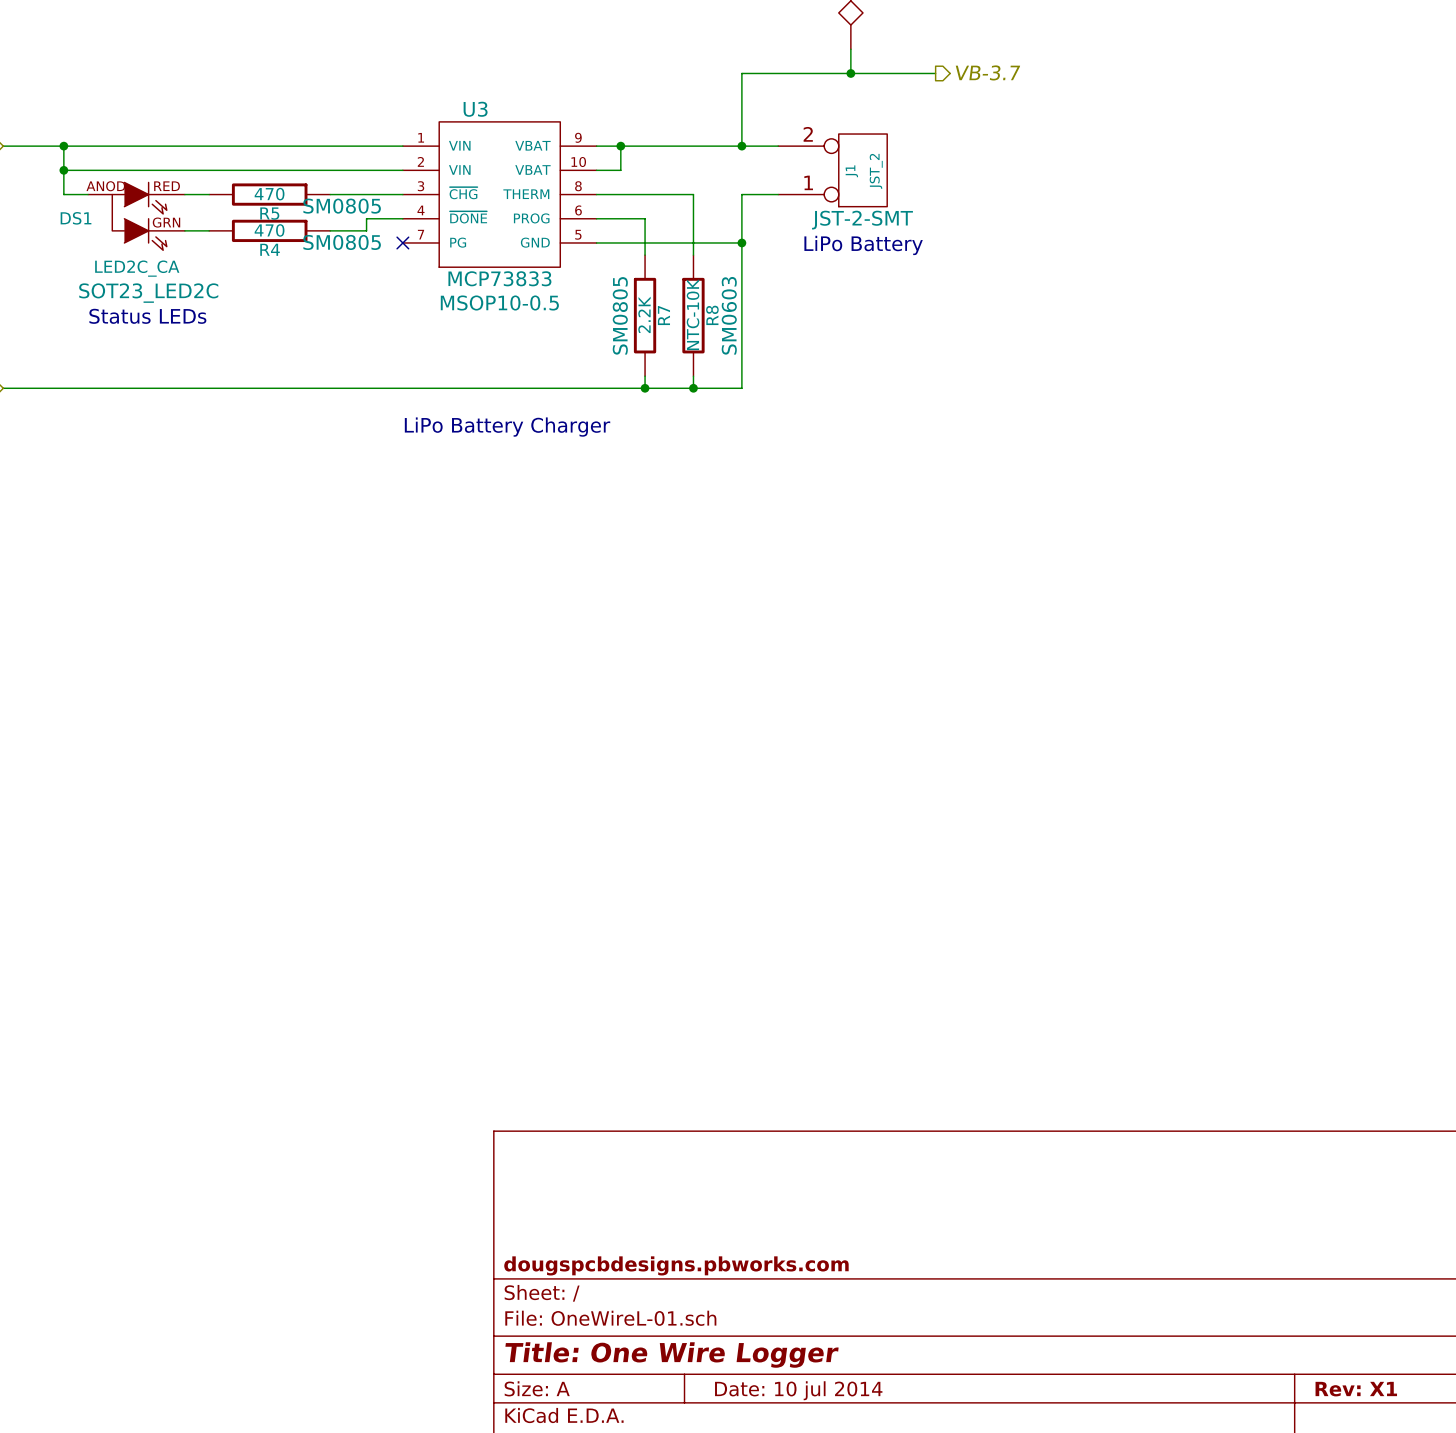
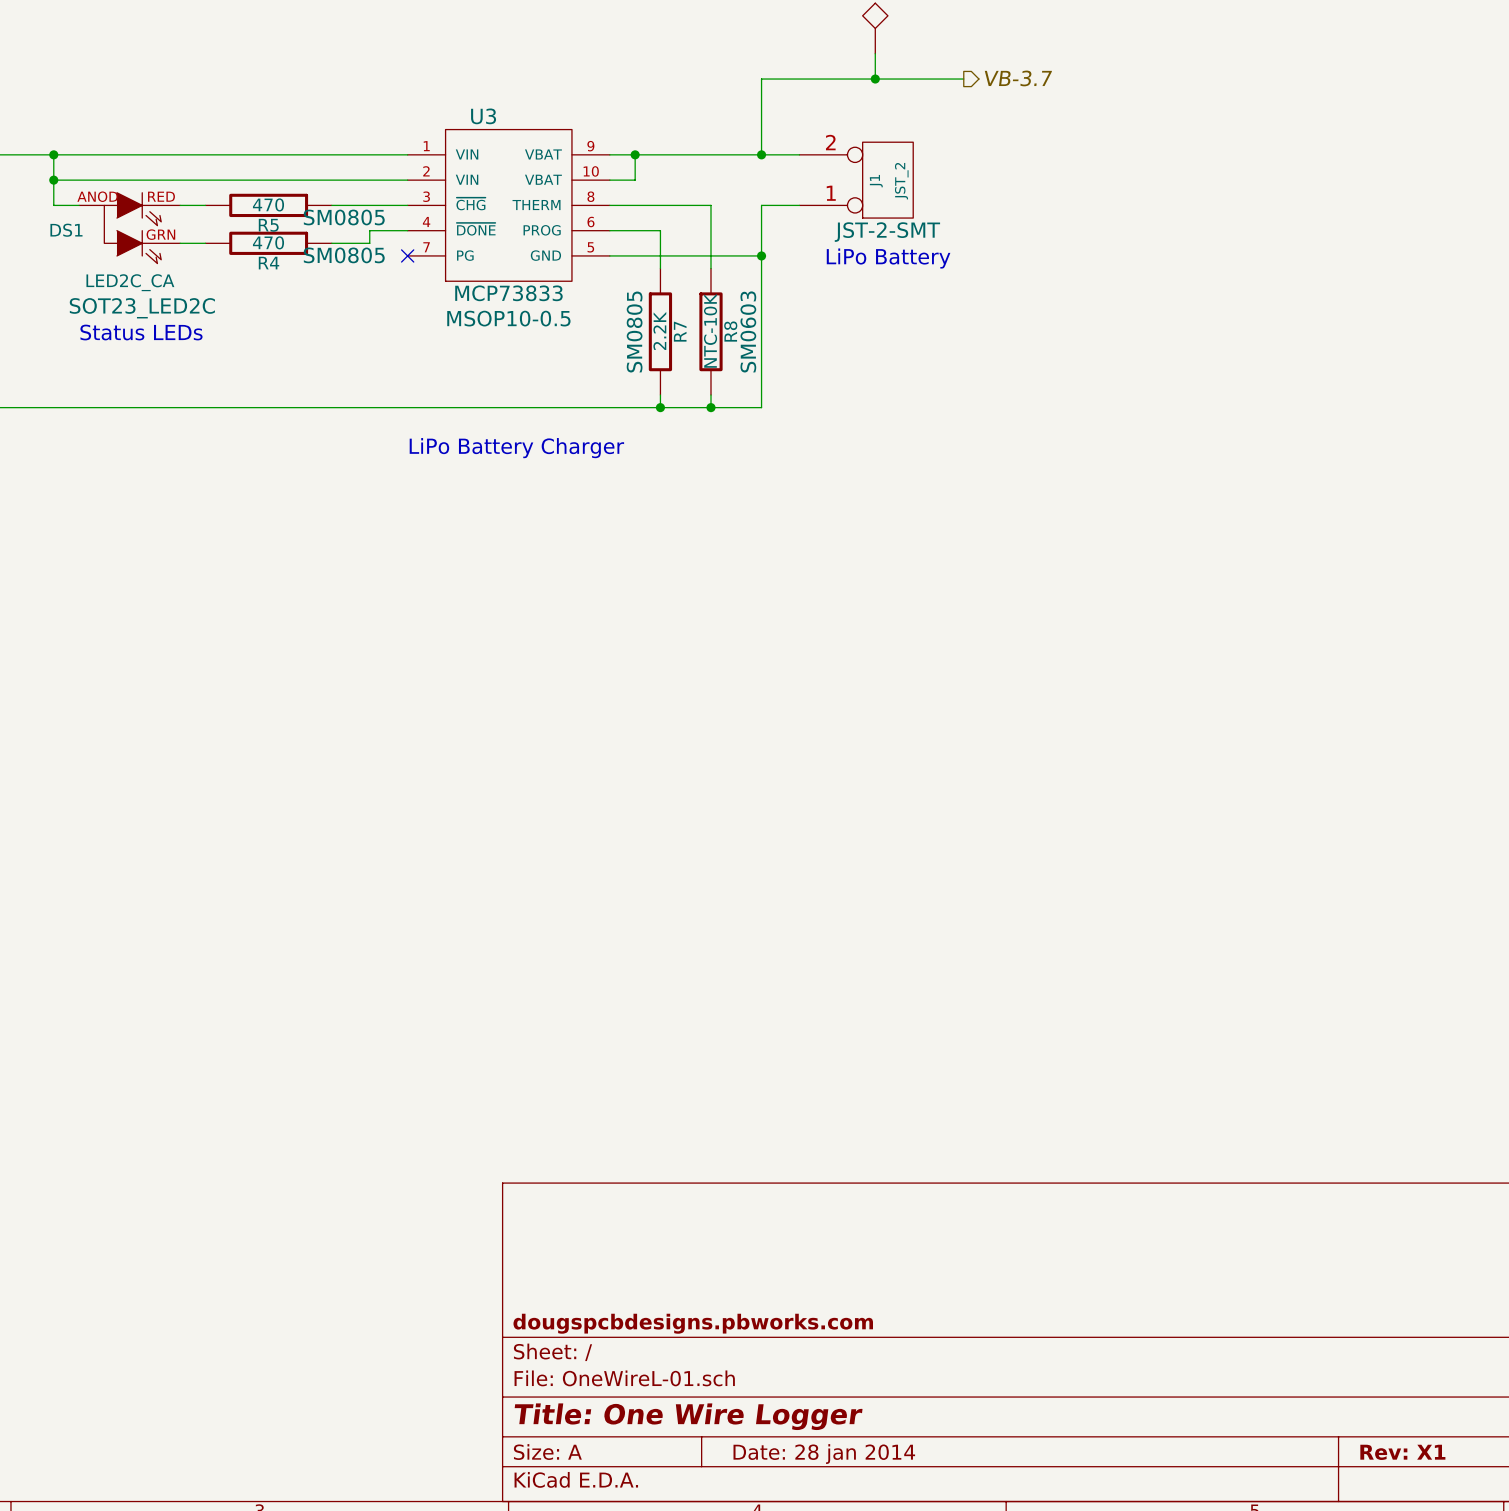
title block: Date: 10 jul 2014 (798, 1390) -> Date: 28 jan 2014 (824, 1454)

